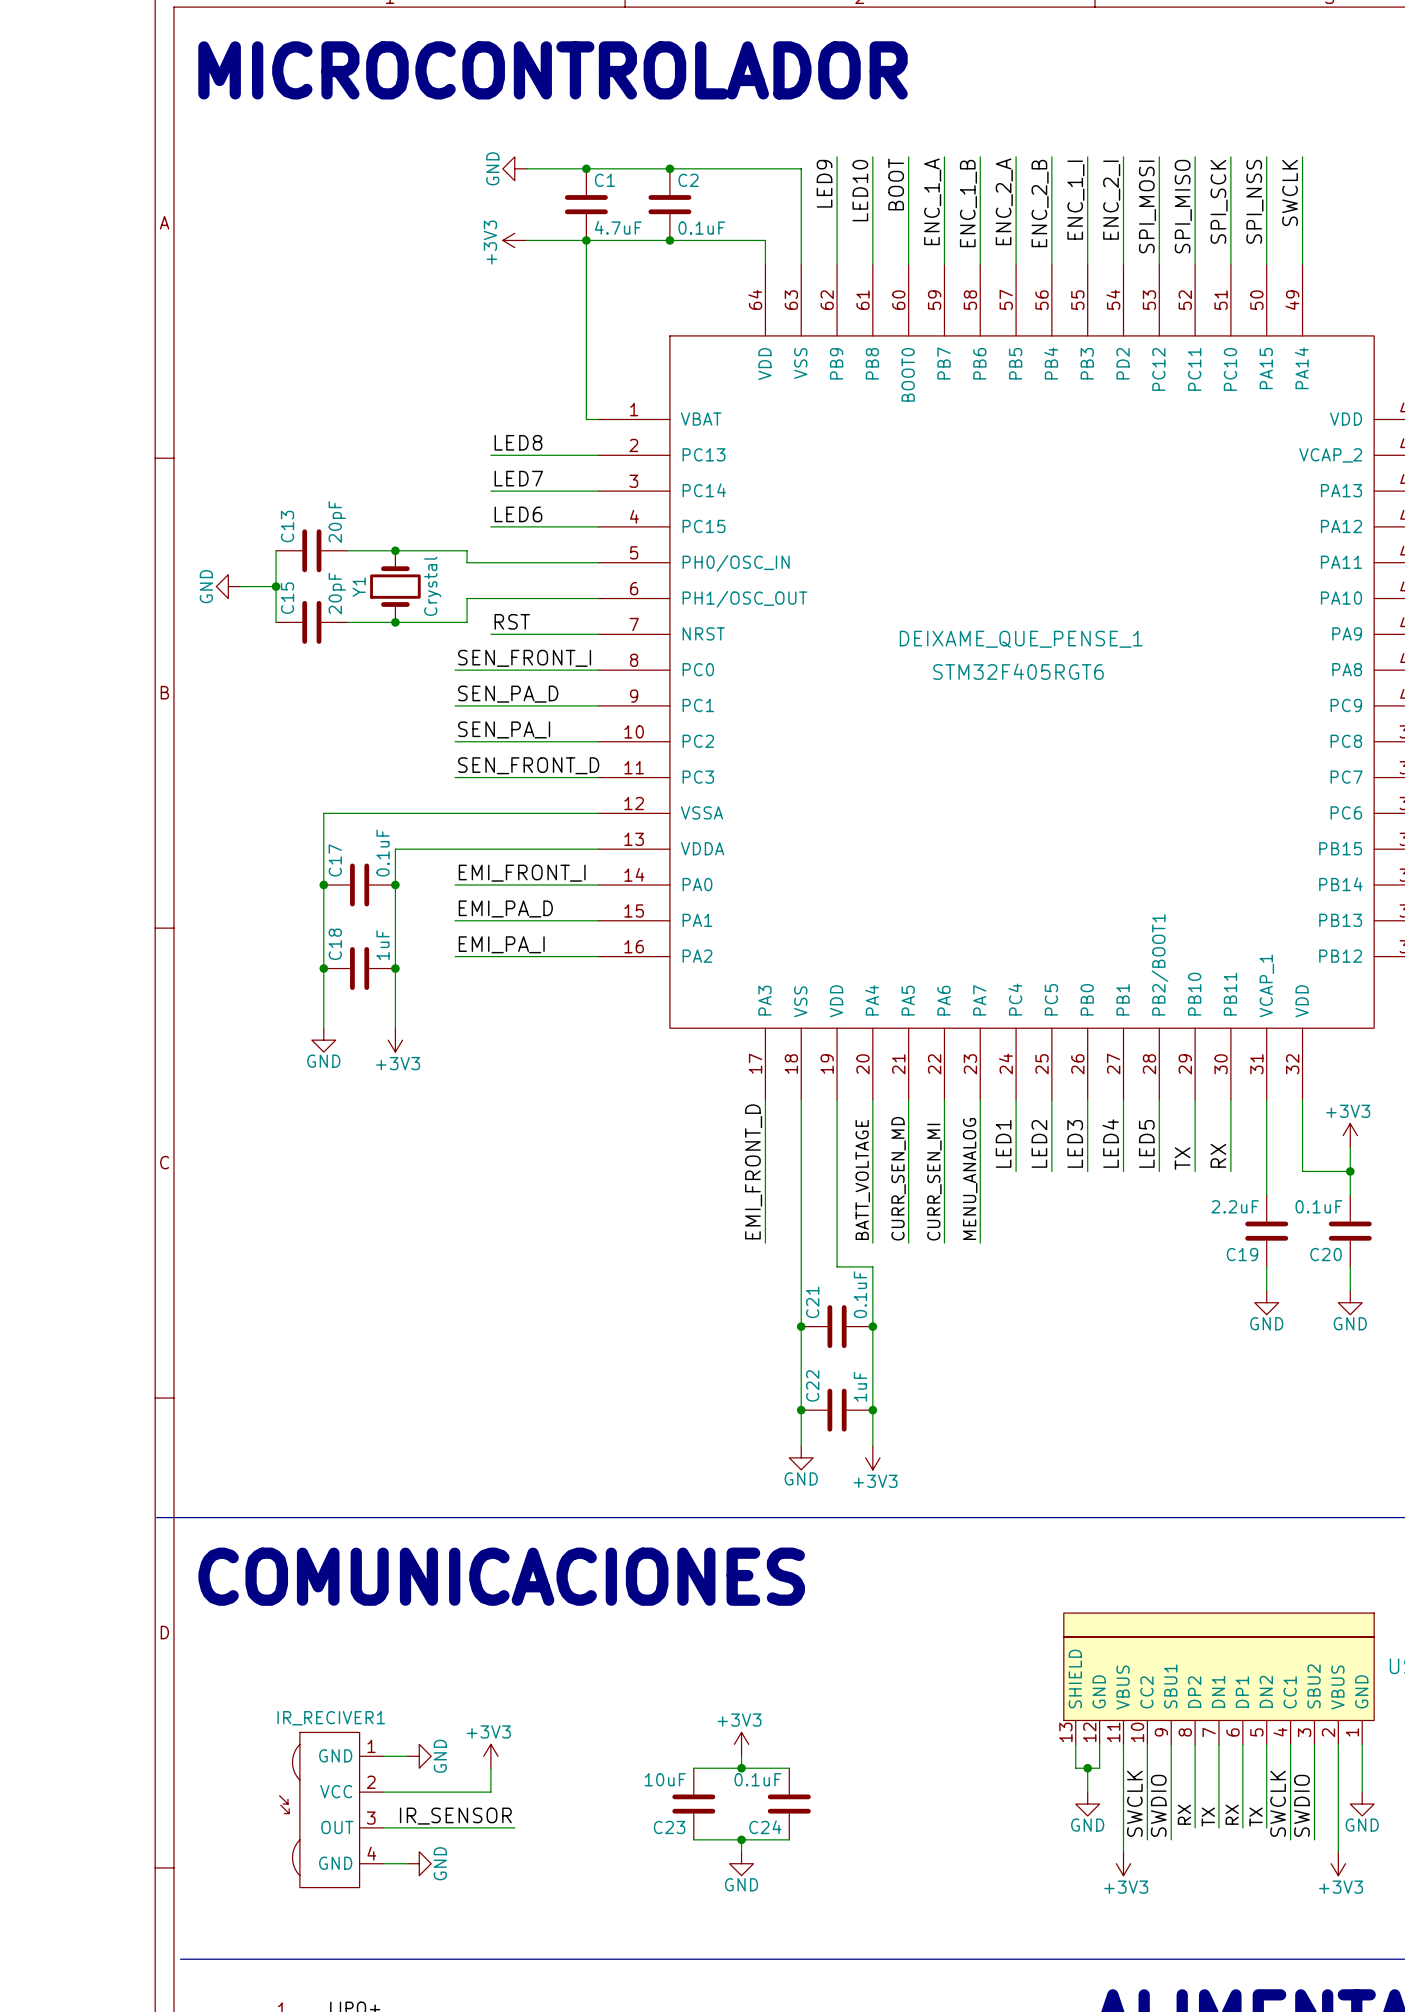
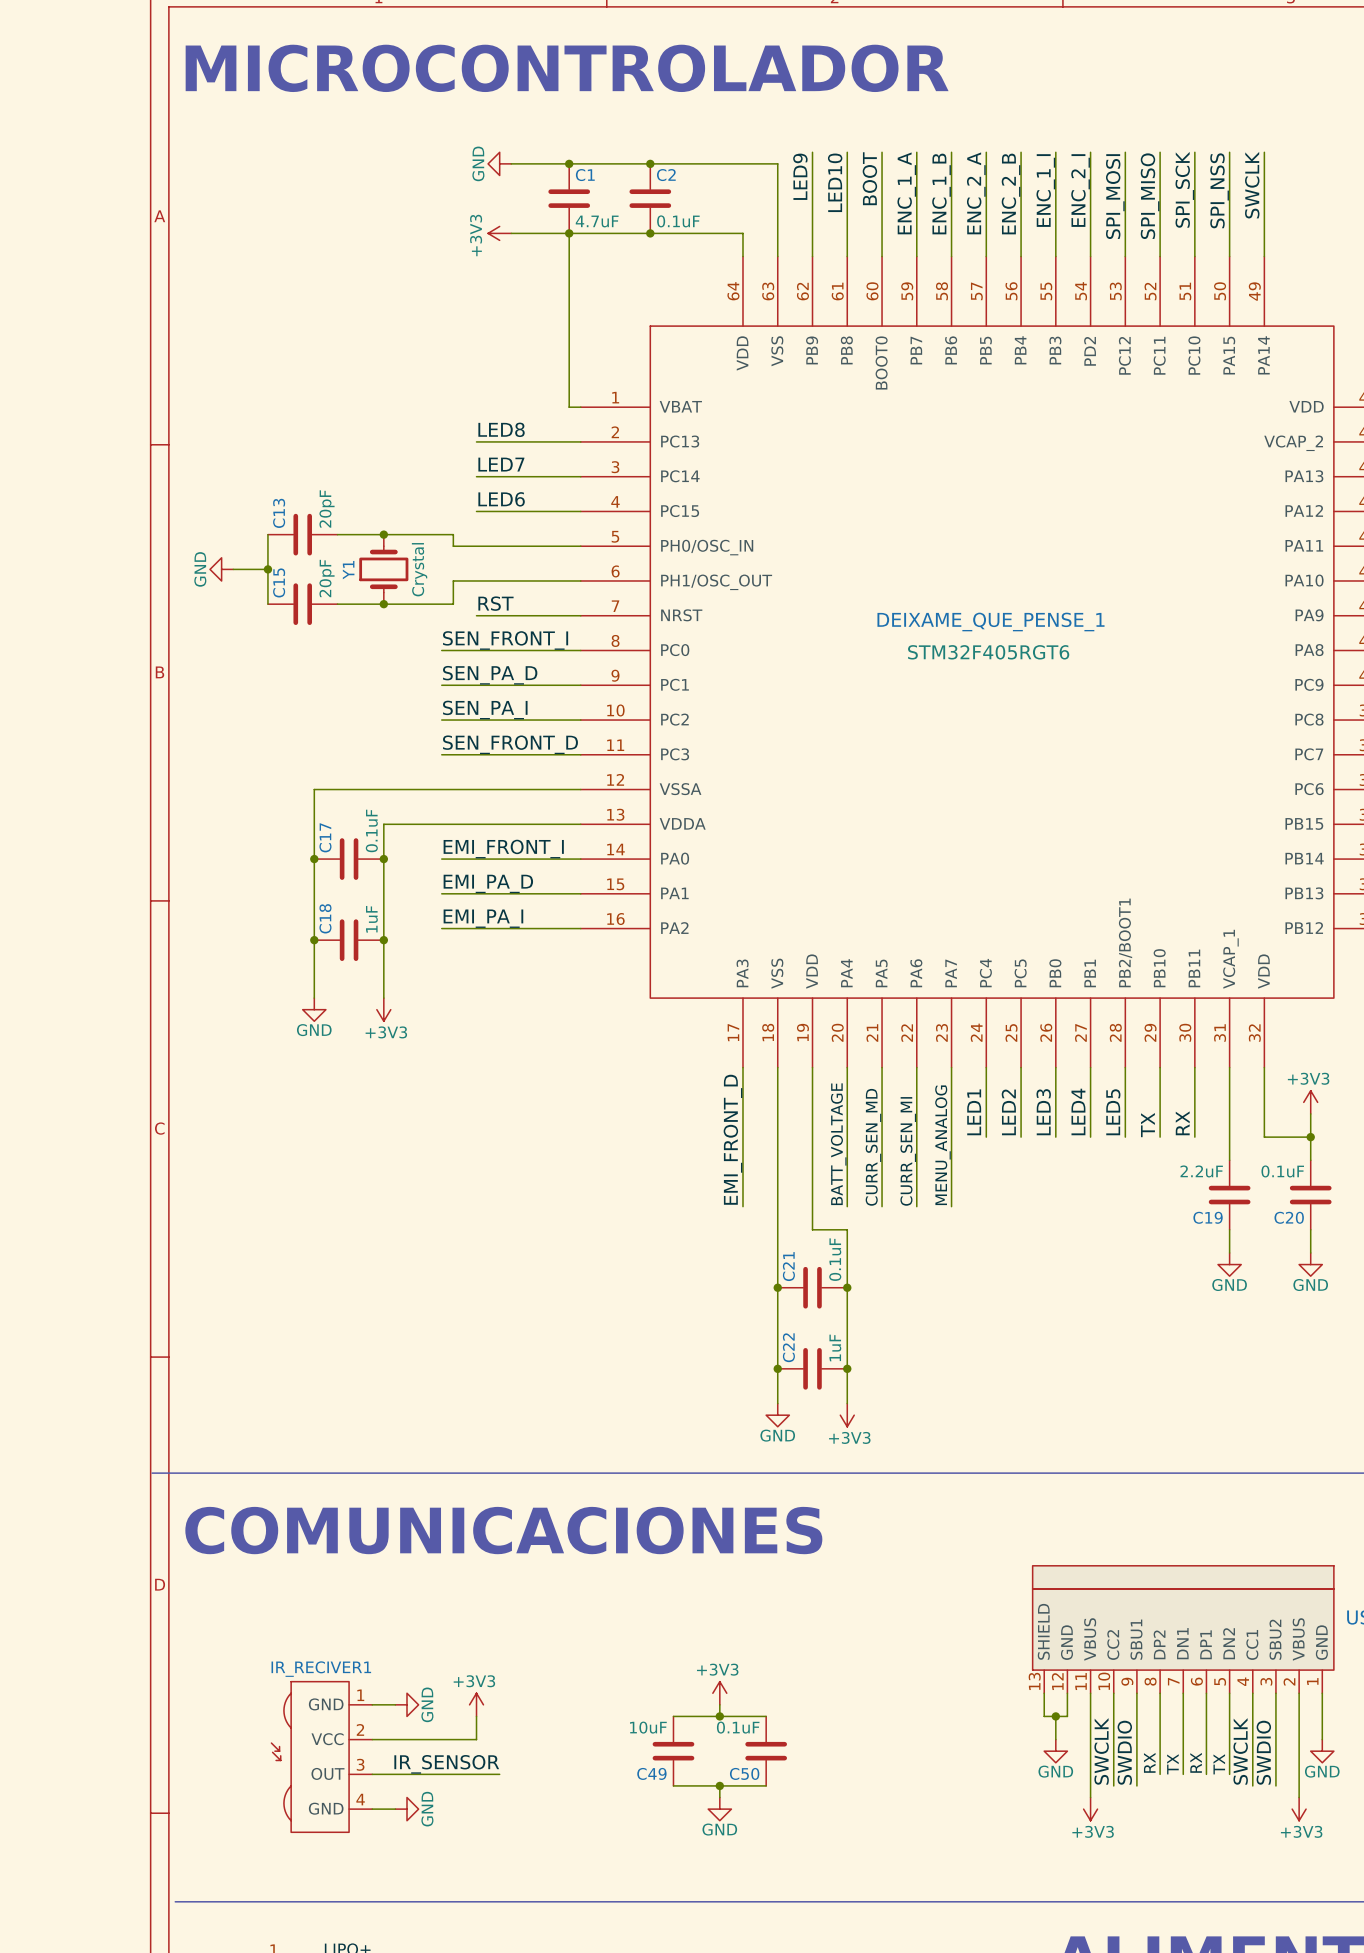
C23 name: C23 (669, 1827) -> C49 (651, 1773)
C24 name: C24 (765, 1827) -> C50 (744, 1773)

